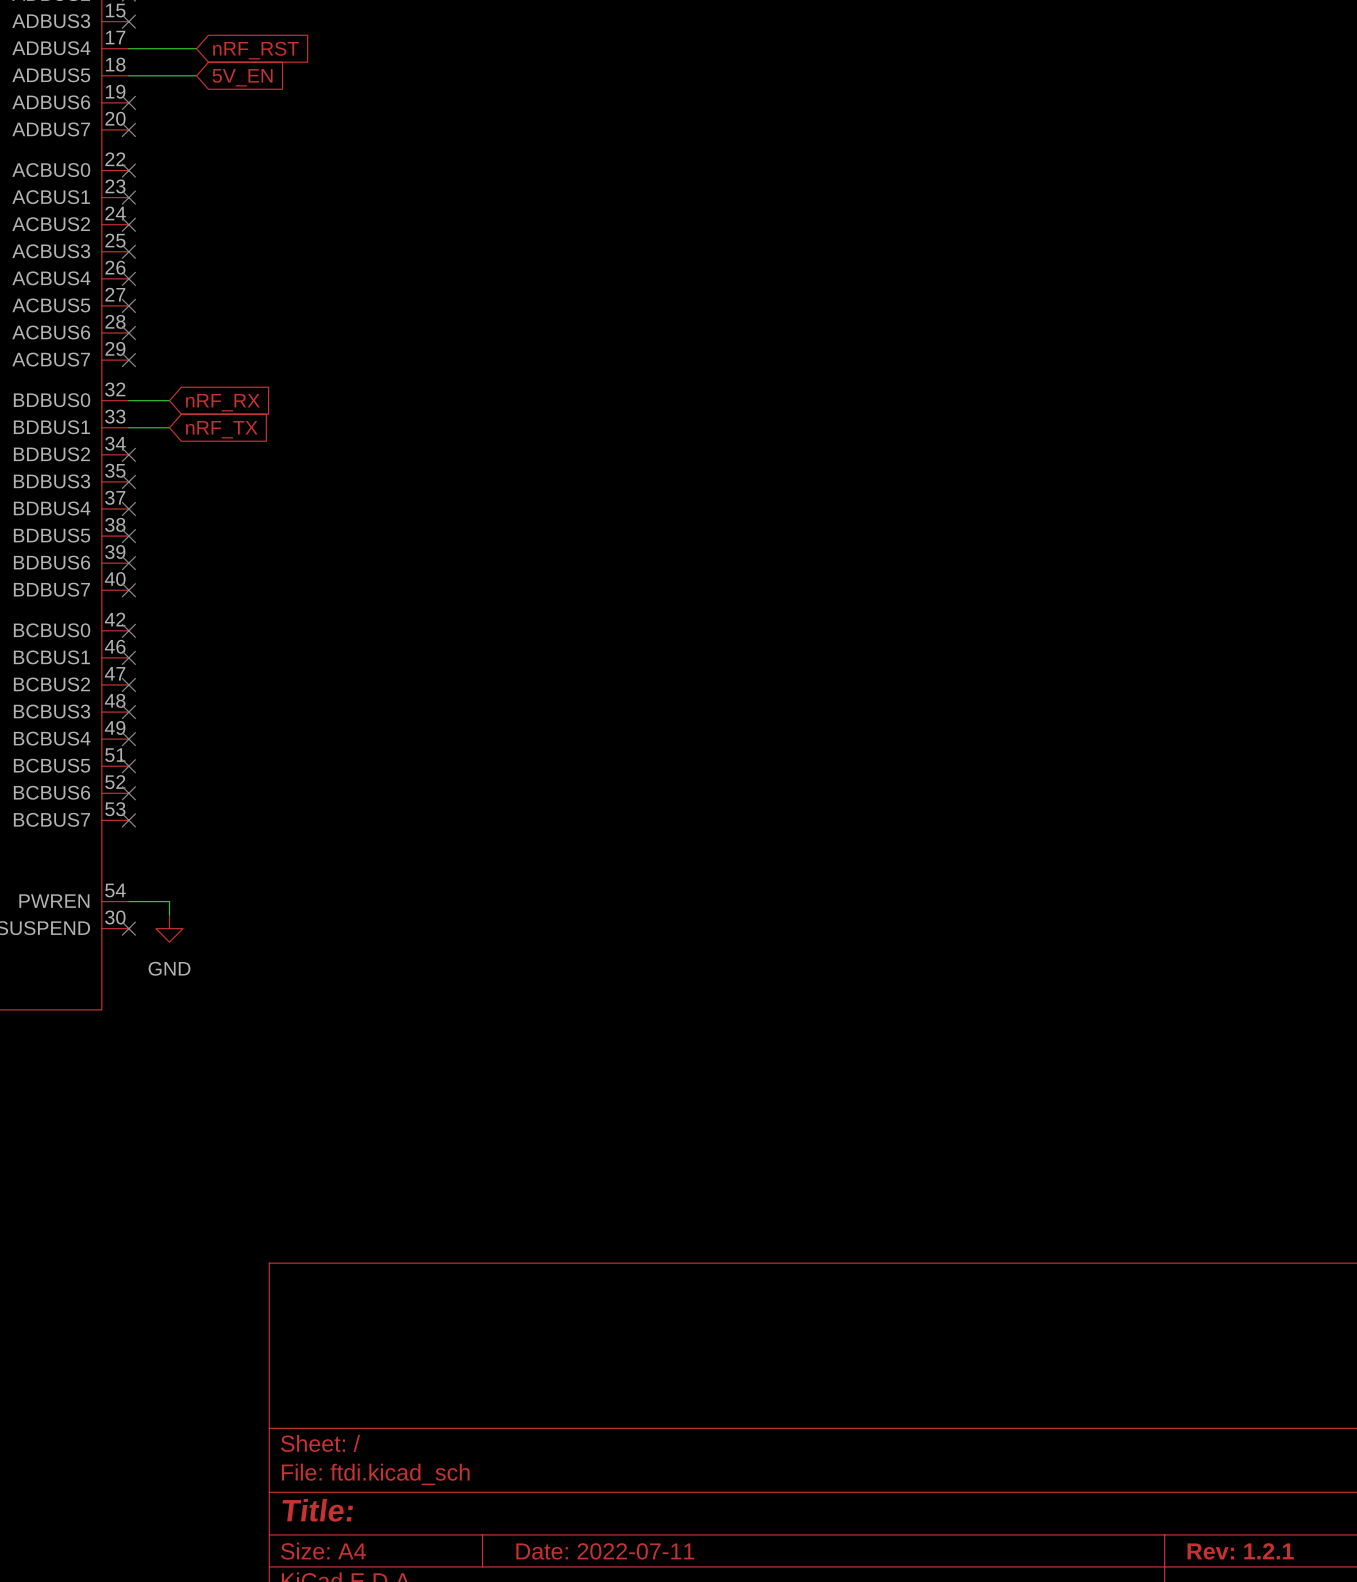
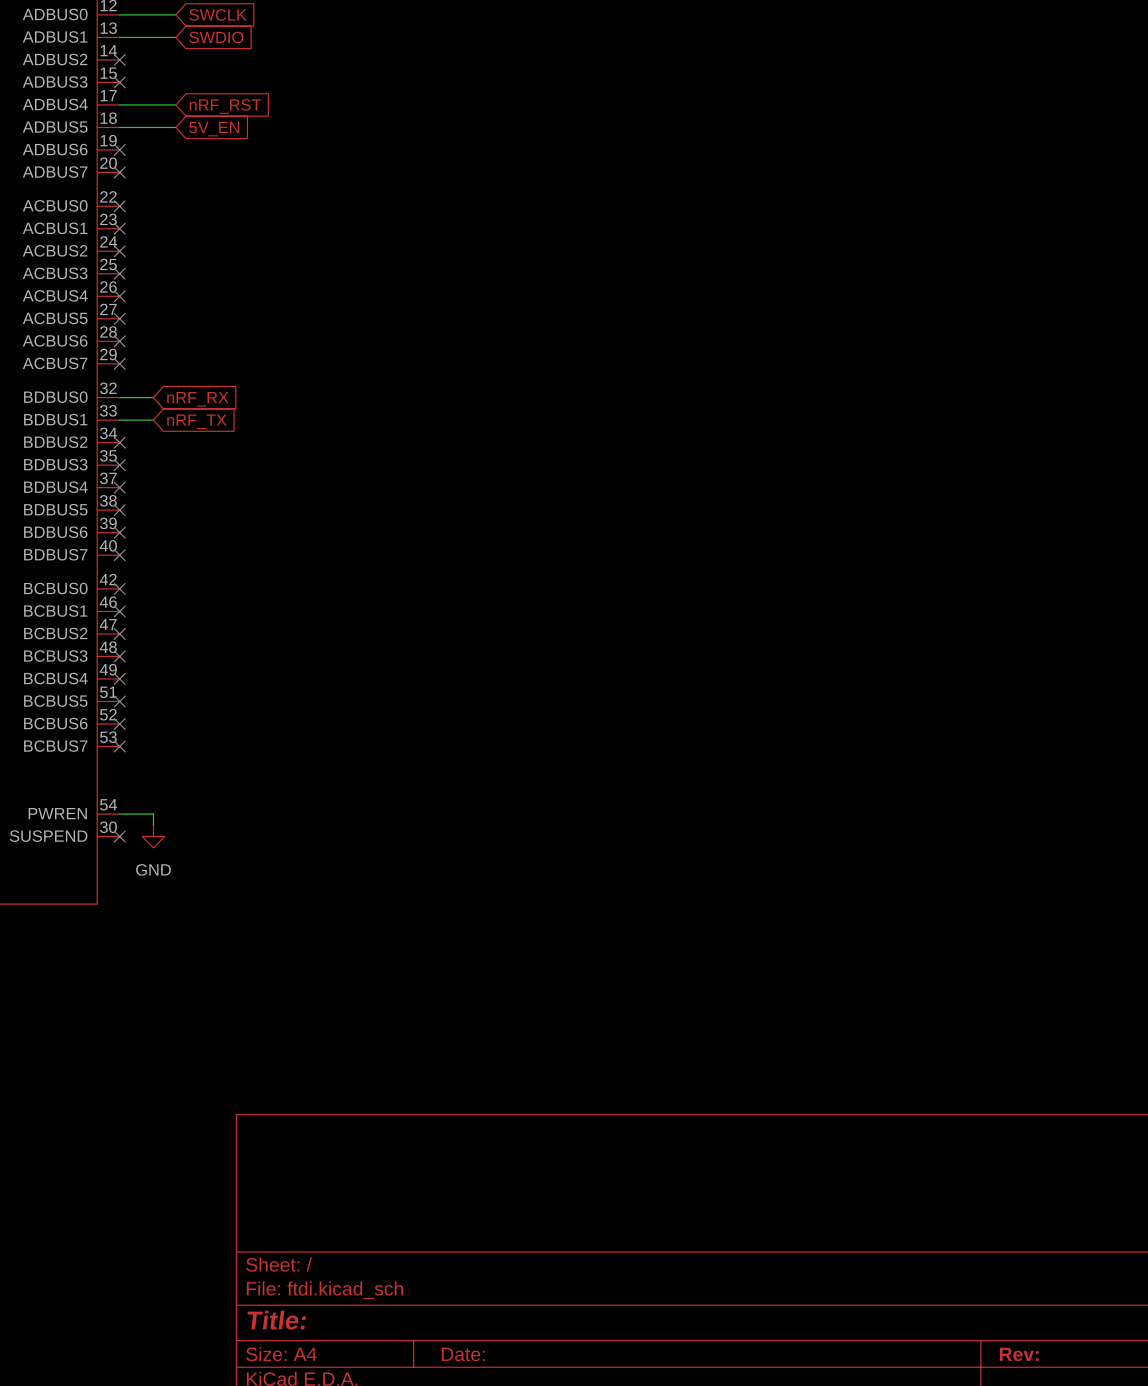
title block: Date: 2022-07-11 (605, 1551) -> Date: (463, 1354)
title block: Rev: 1.2.1 (1240, 1551) -> Rev: (1019, 1354)

